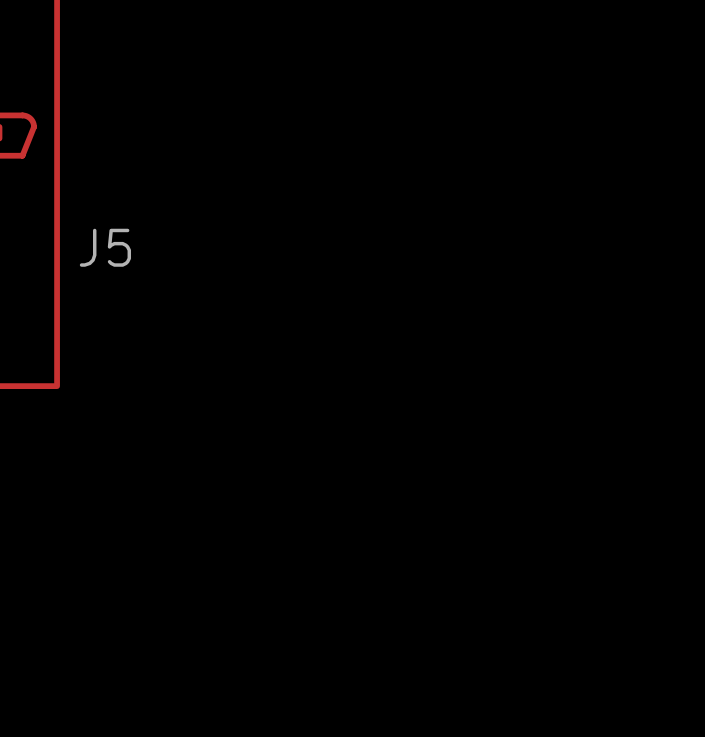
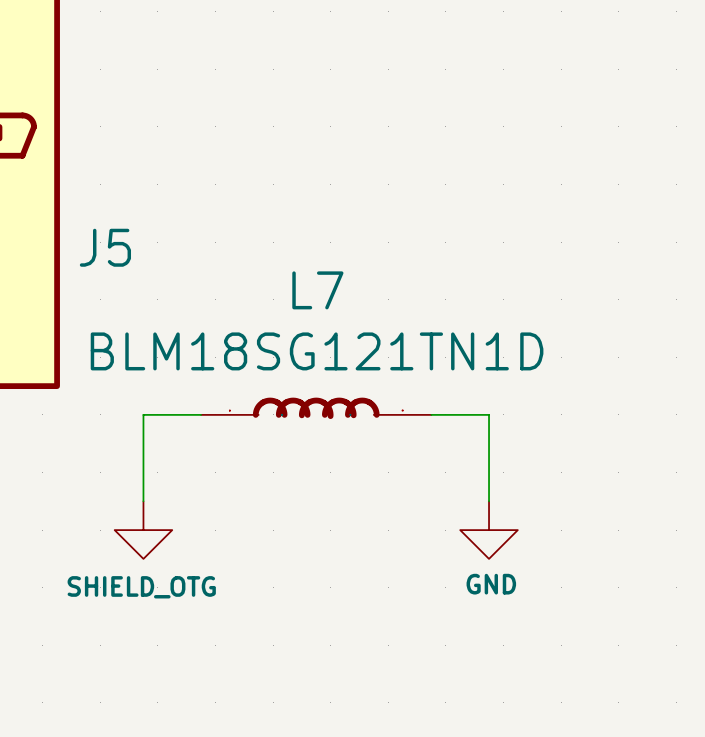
L7: none -> BLM18SG121TN1D (316, 408)
wire: none -> (201, 414) (143, 414) (143, 501)
wire: none -> (431, 414) (489, 414) (489, 501)
power symbol: none -> SHIELD_OTG (143, 530)
power symbol: none -> GND (489, 530)

